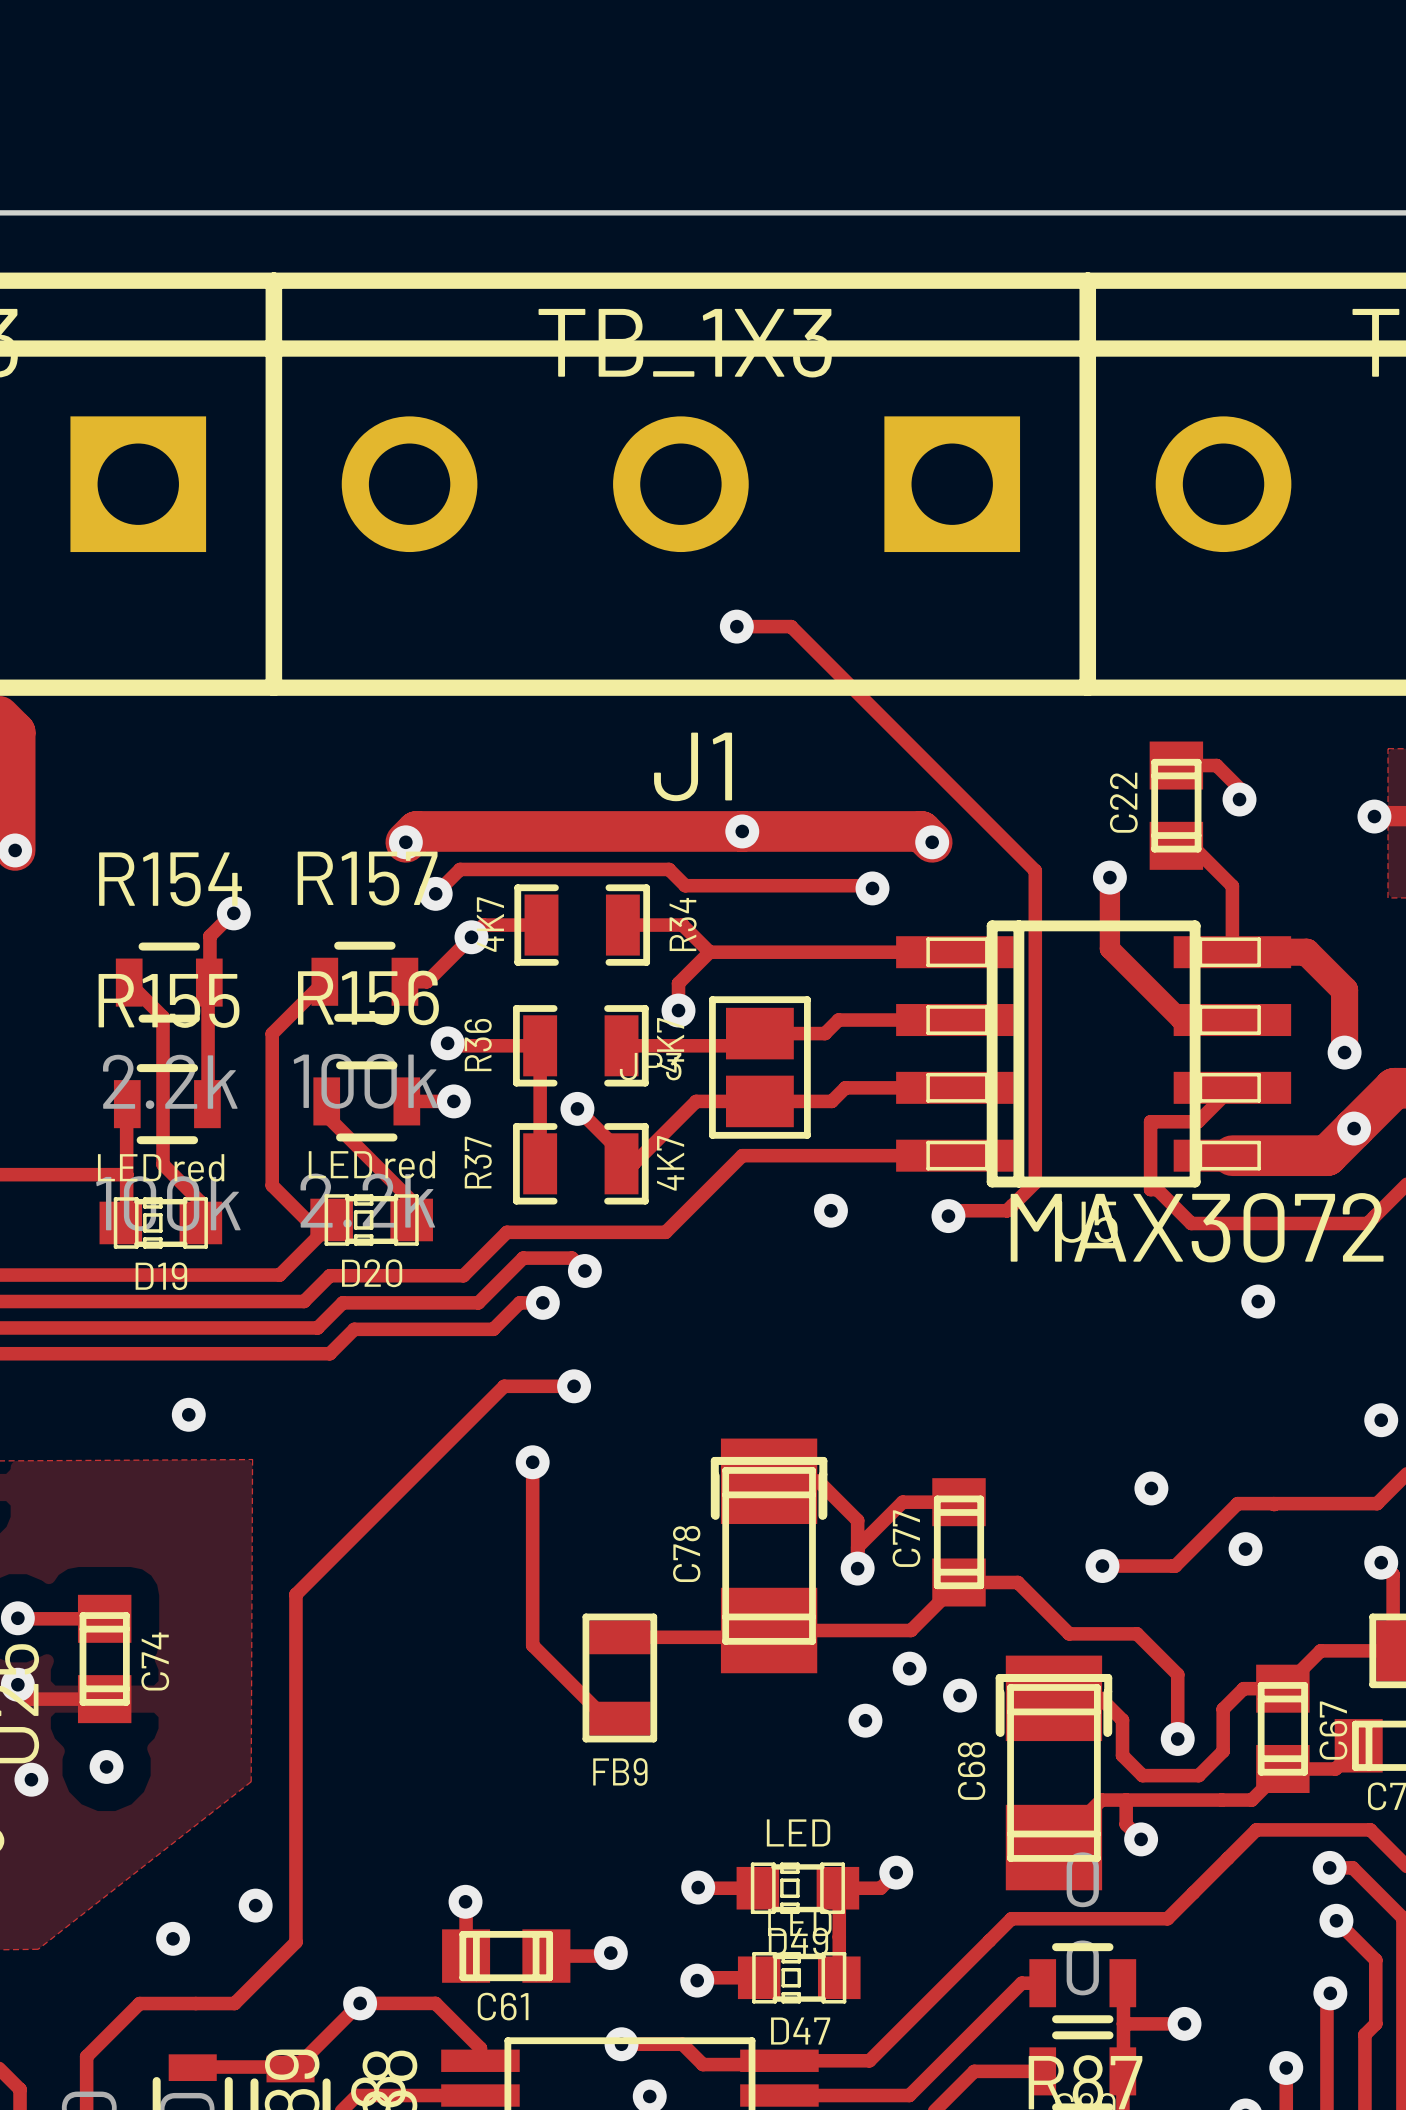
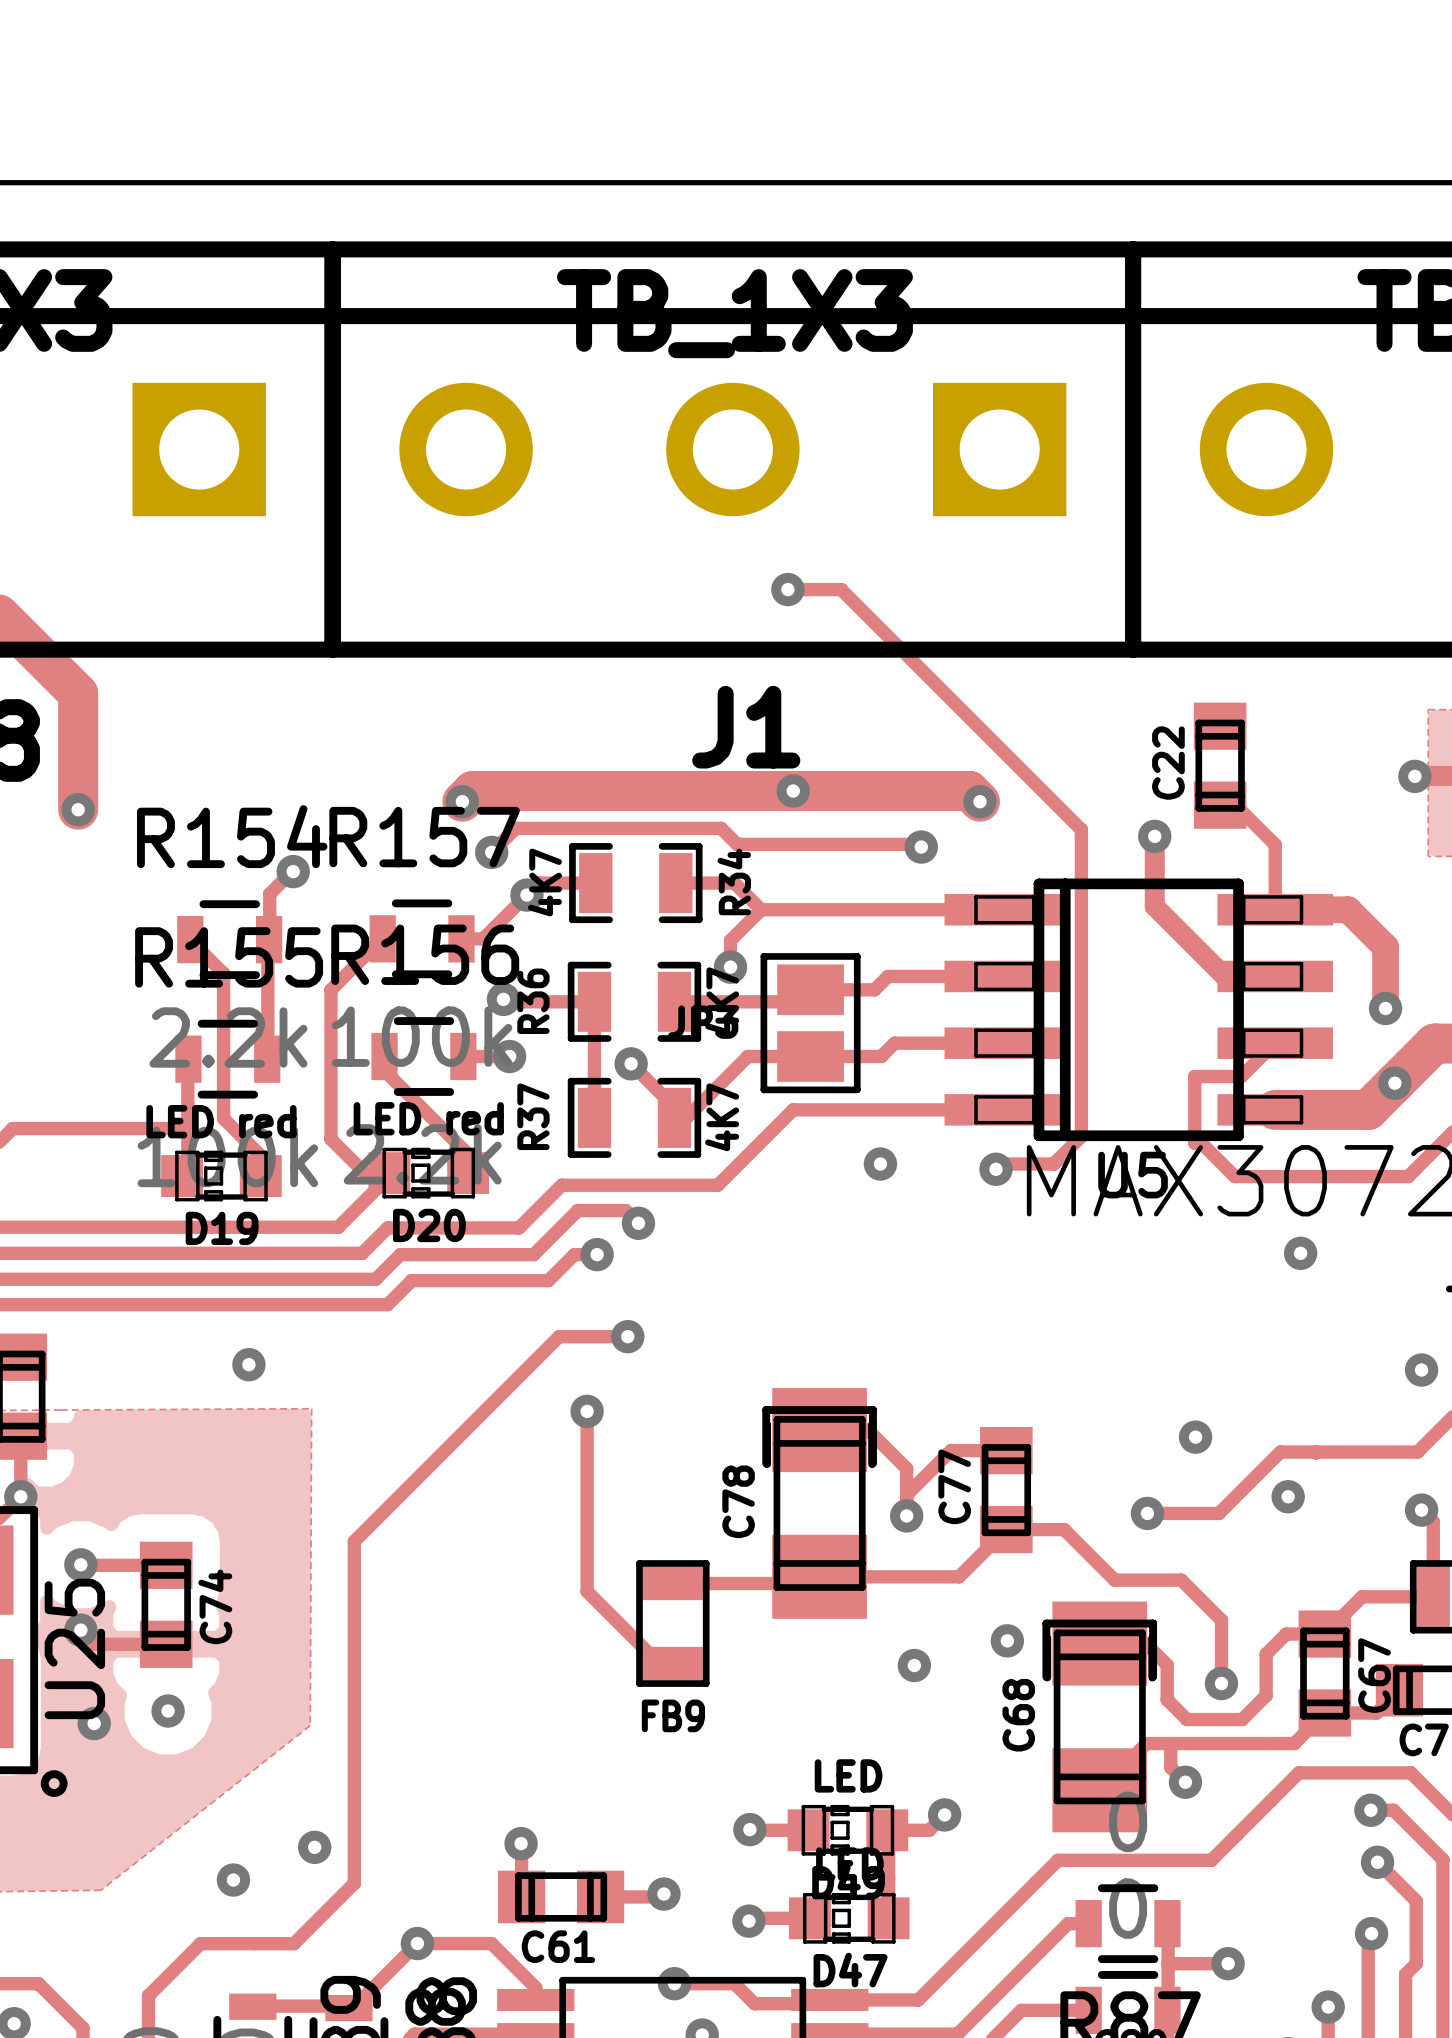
track: (1176, 765) (1216, 765) (1239, 788) (1239, 799) -> none
via: (1239, 799) -> none
via: (909, 1668) -> none

